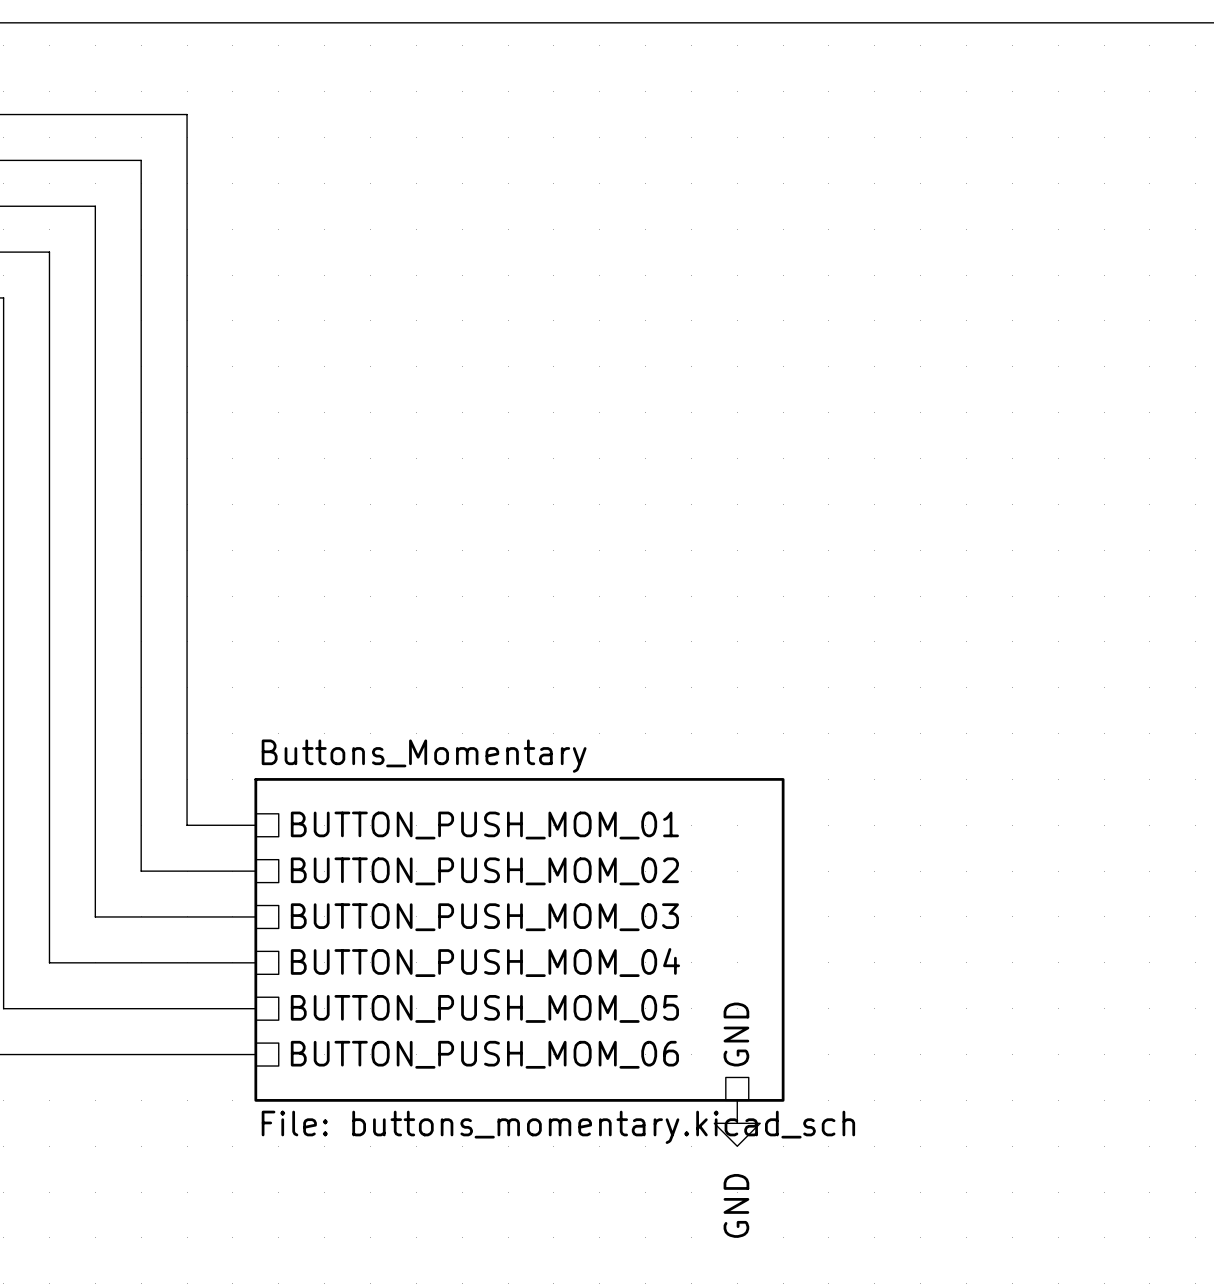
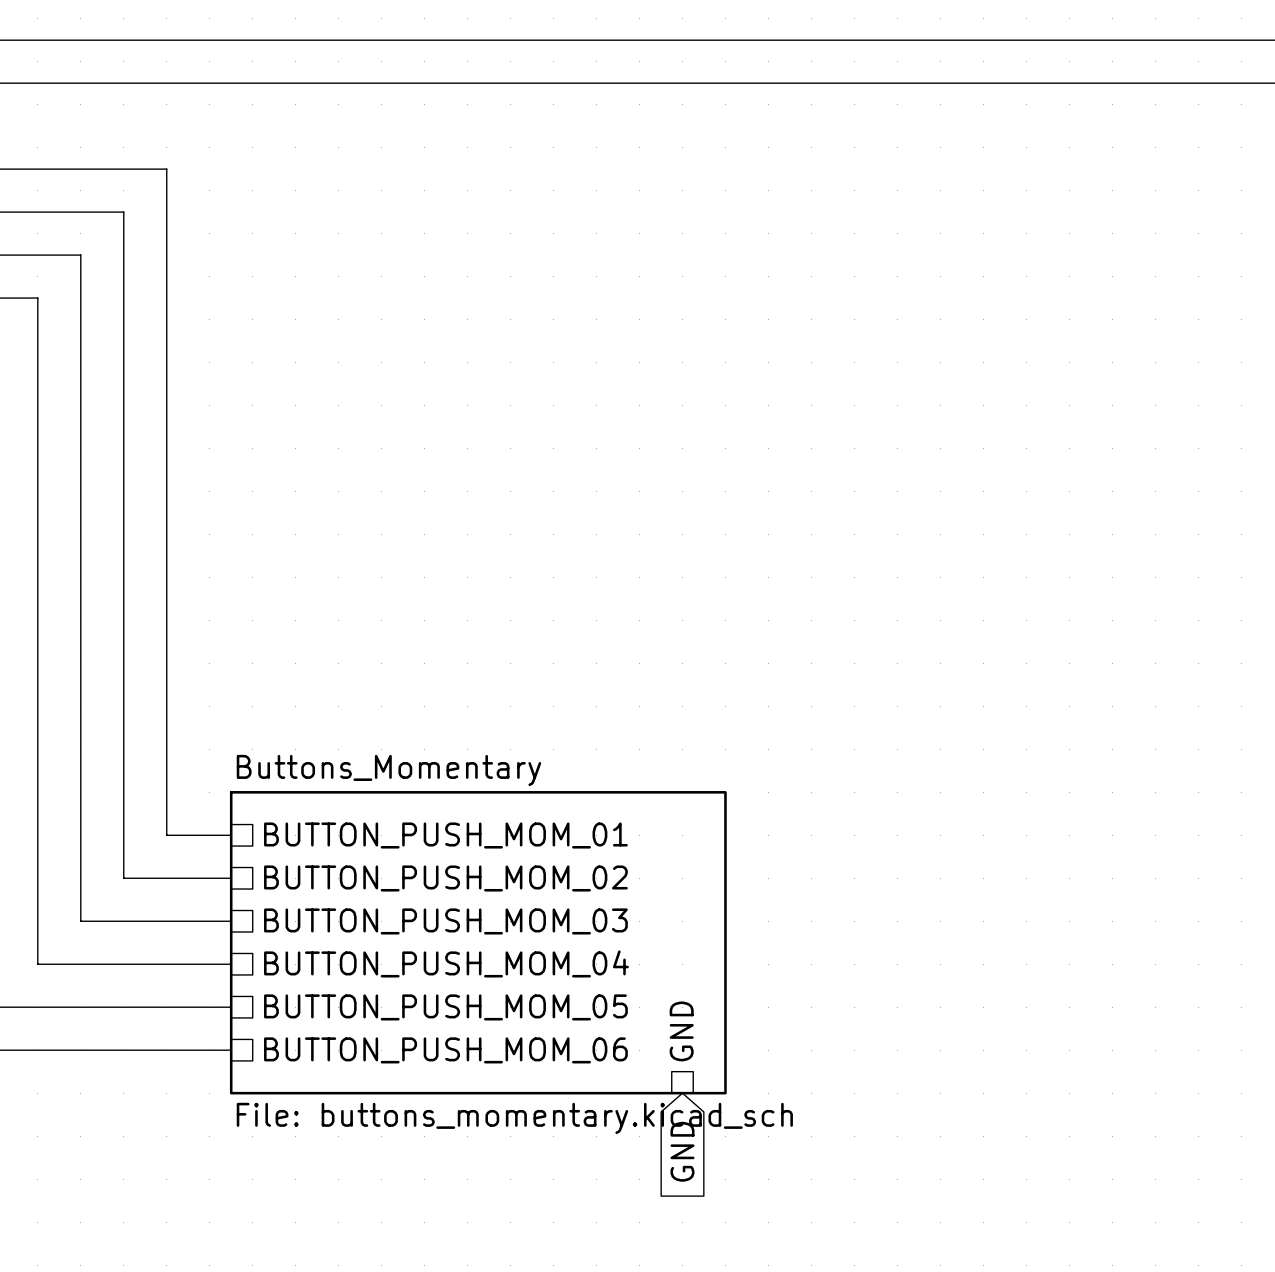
power symbol: GND (737, 1123) -> none
global label: none -> GND (682, 1151)

